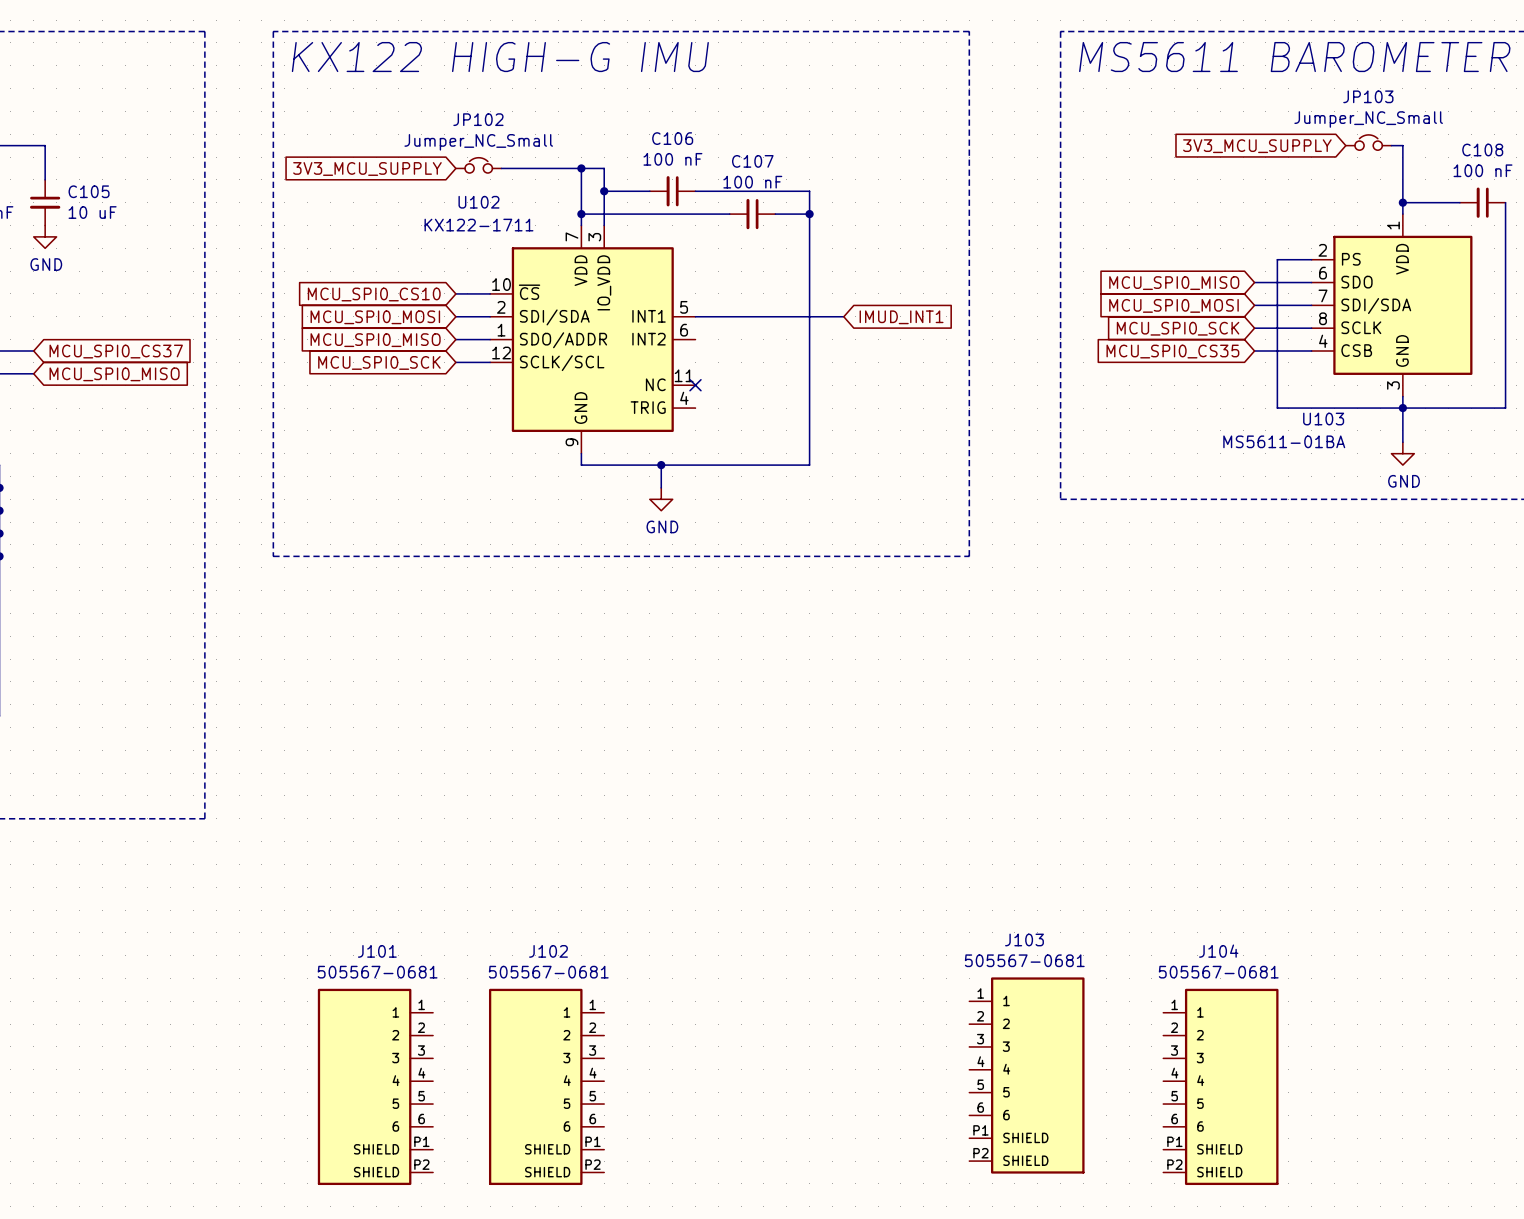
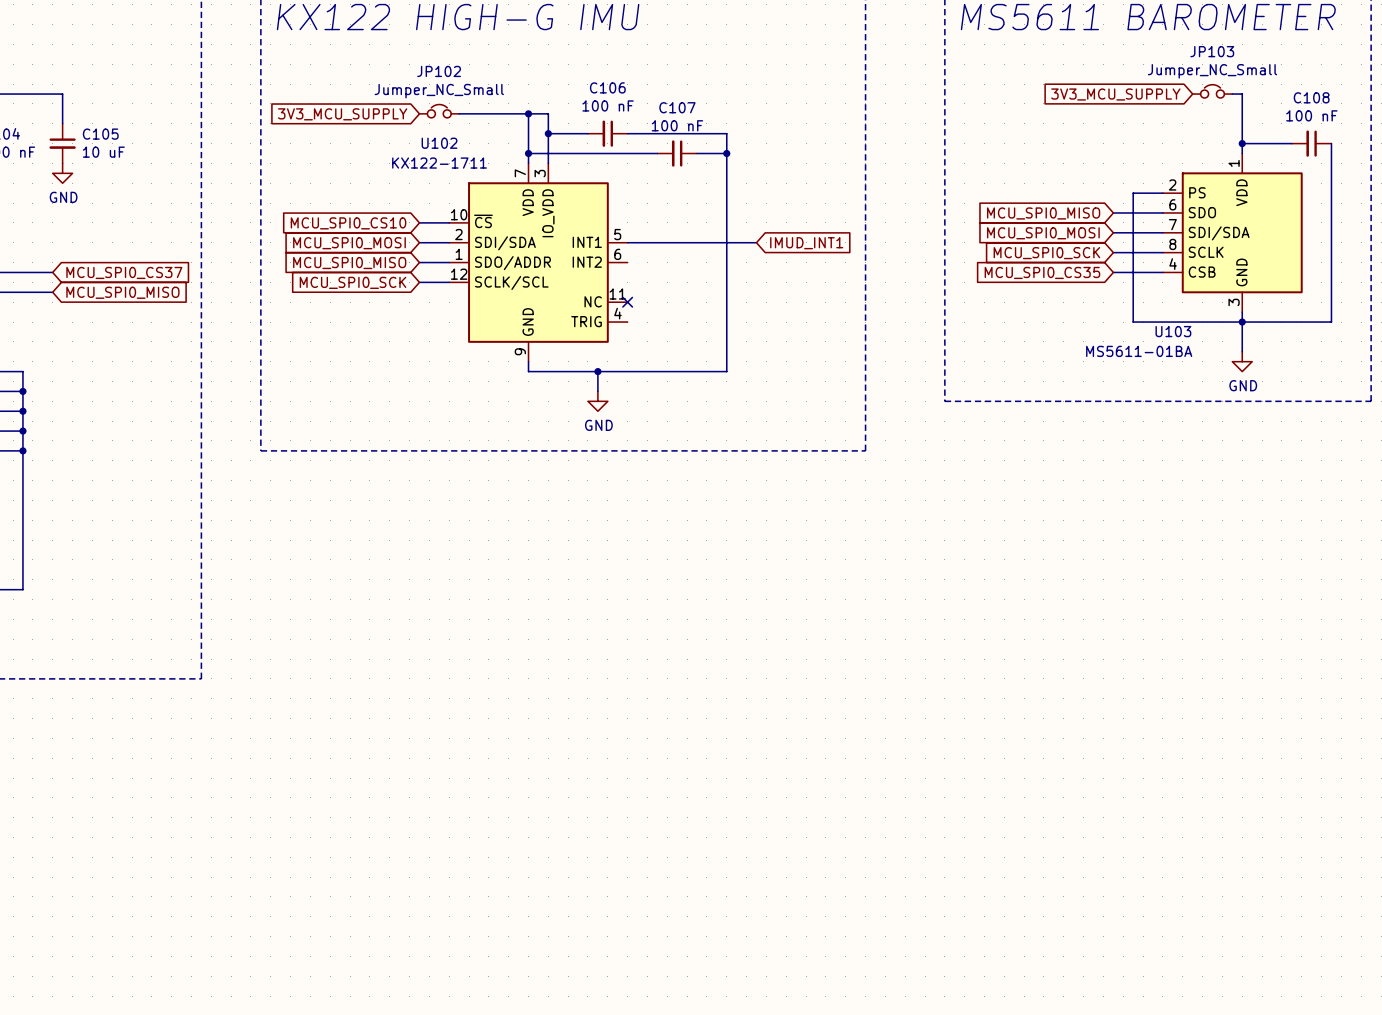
J103: 505567-0681 (1026, 1075) -> none
J101: 505567-0681 (375, 1086) -> none
J102: 505567-0681 (546, 1086) -> none
J104: 505567-0681 (1220, 1086) -> none

